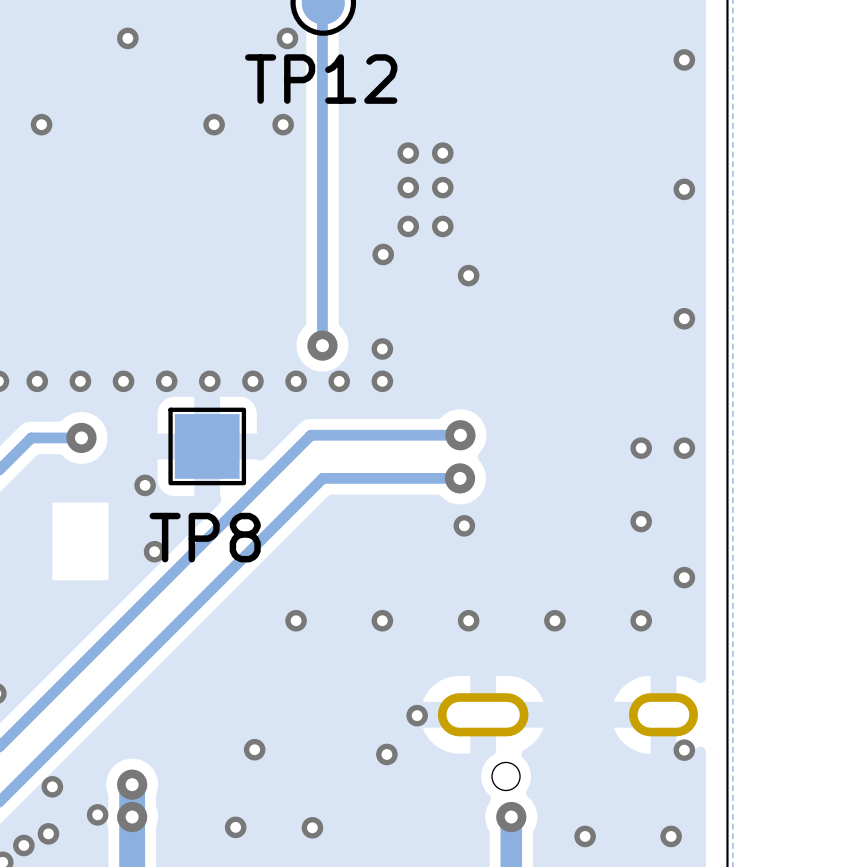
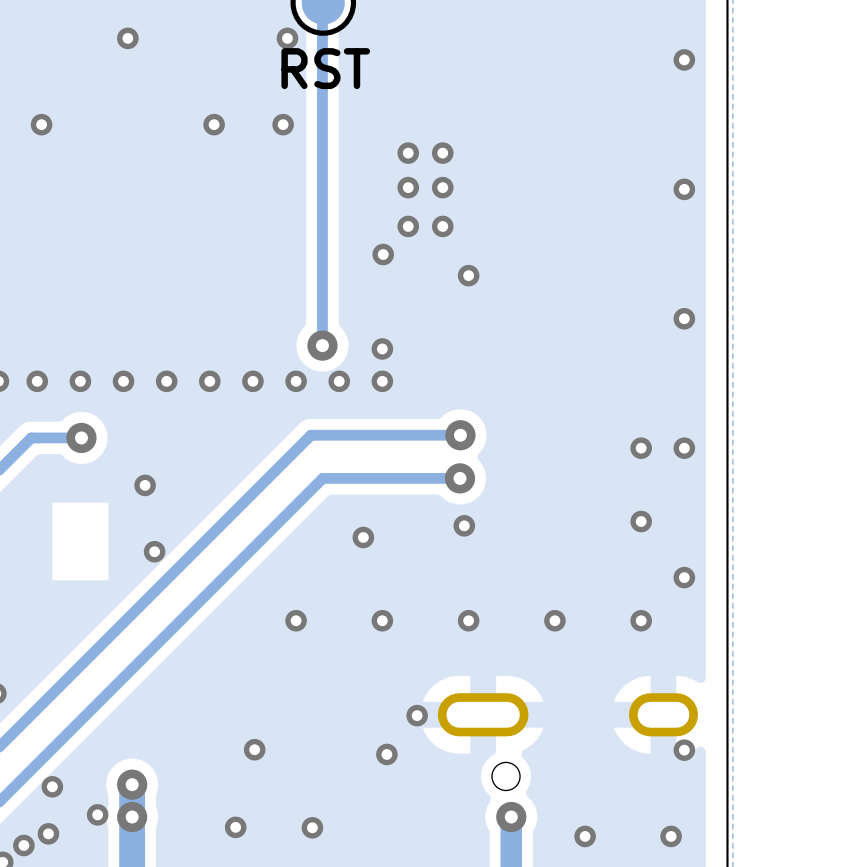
TP12 value: none -> RST (325, 68)
TP12 name: TP12 (321, 79) -> none
TP8: (207, 446) -> none
via: none -> (363, 537)

